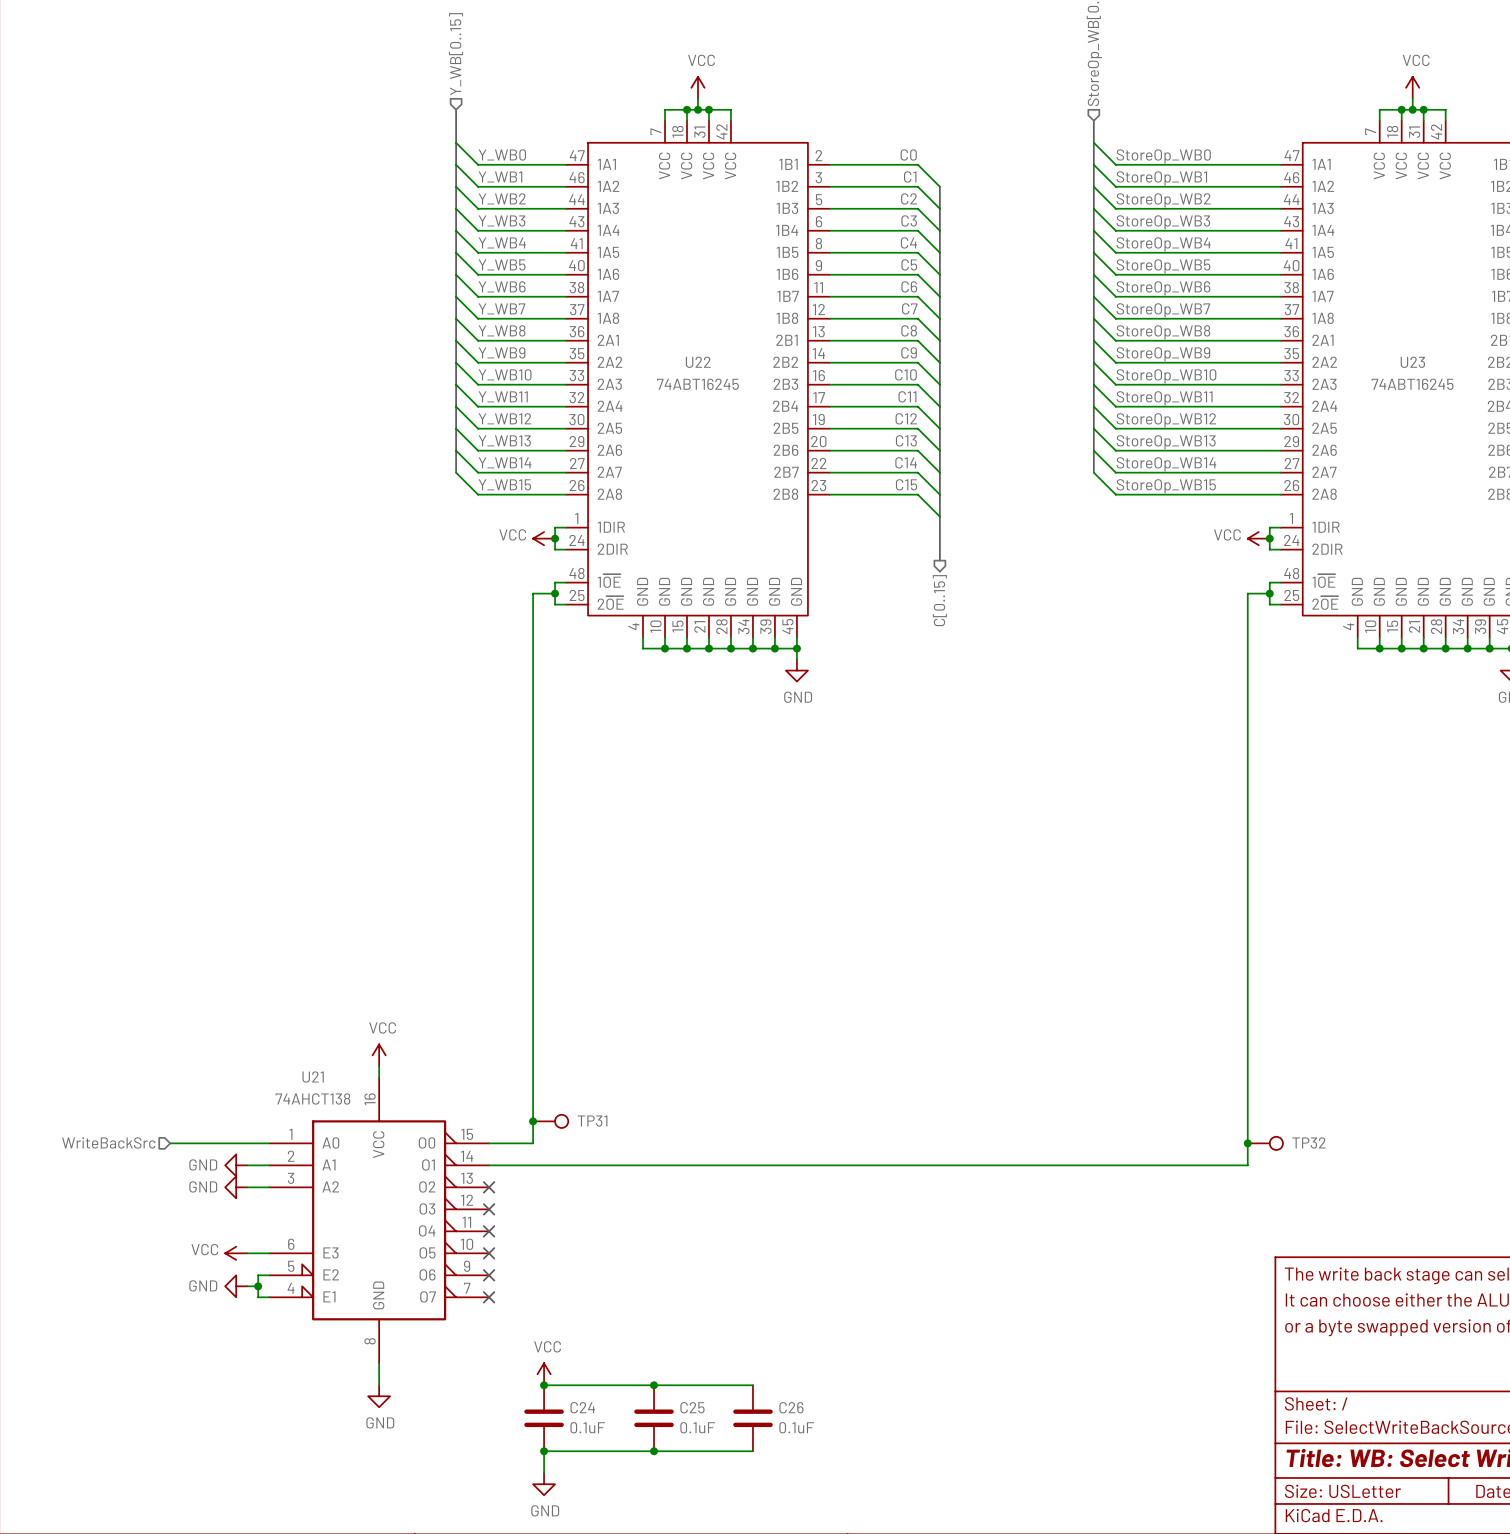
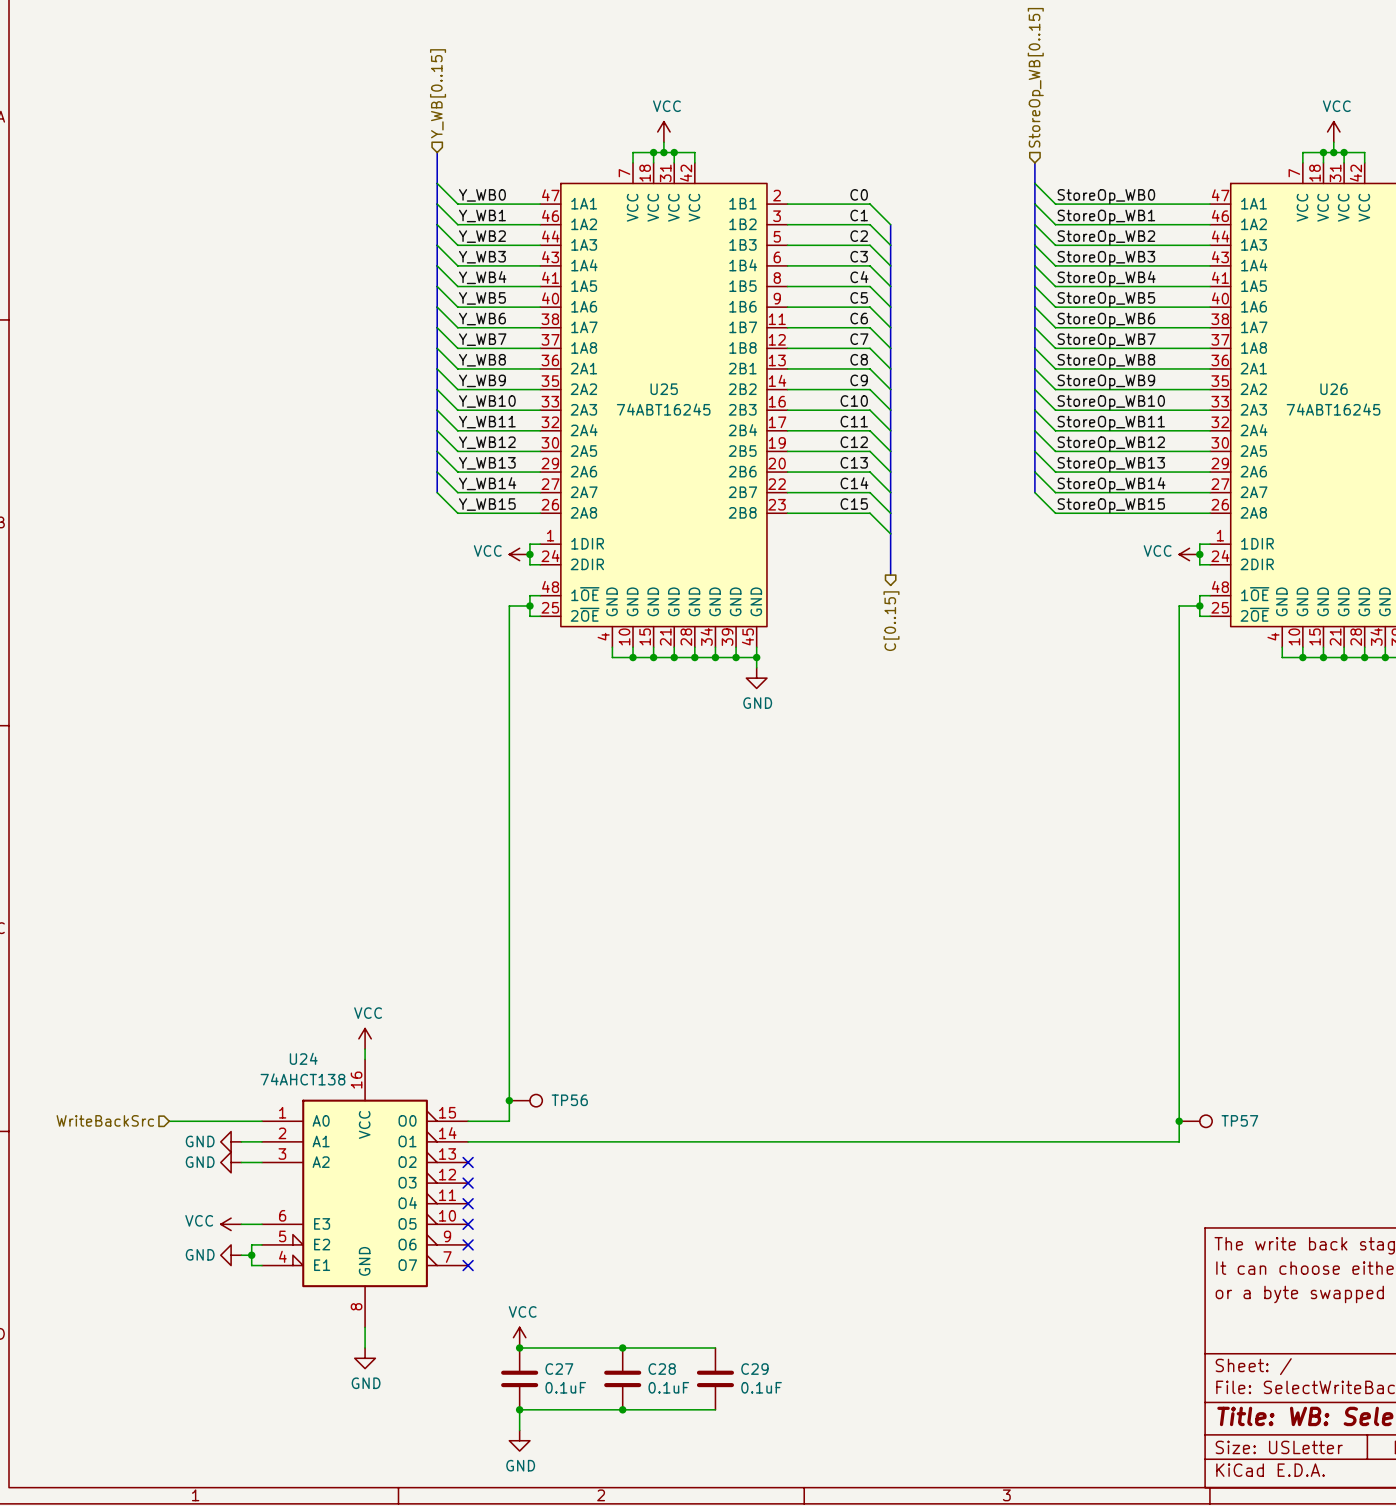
U22 name: U22 (698, 362) -> U25 (664, 389)
U23 name: U23 (1412, 362) -> U26 (1334, 389)
U21 name: U21 (313, 1076) -> U24 (303, 1058)
TP31 name: TP31 (592, 1121) -> TP56 (569, 1100)
TP32 name: TP32 (1309, 1142) -> TP57 (1239, 1120)
C24 name: C24 (582, 1407) -> C27 (559, 1369)
C25 name: C25 (692, 1407) -> C28 (662, 1369)
C26 name: C26 (791, 1407) -> C29 (754, 1369)

